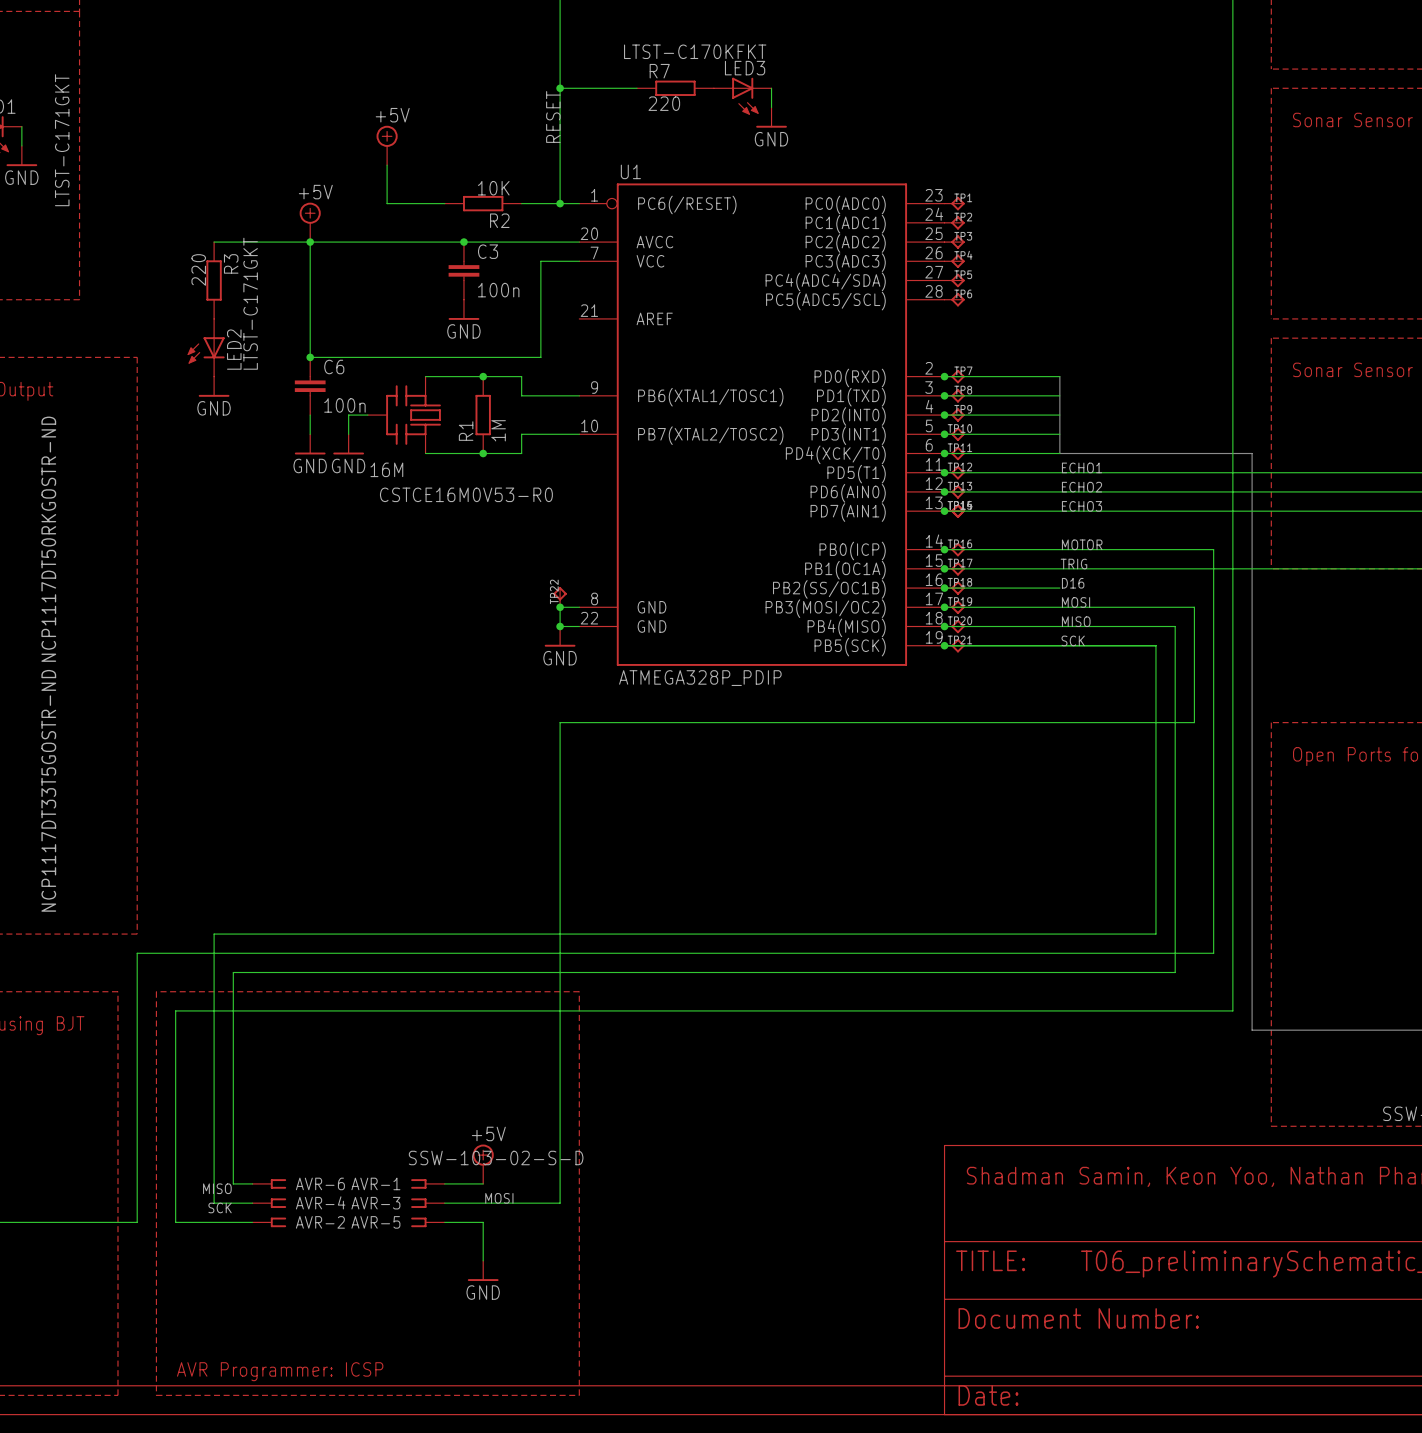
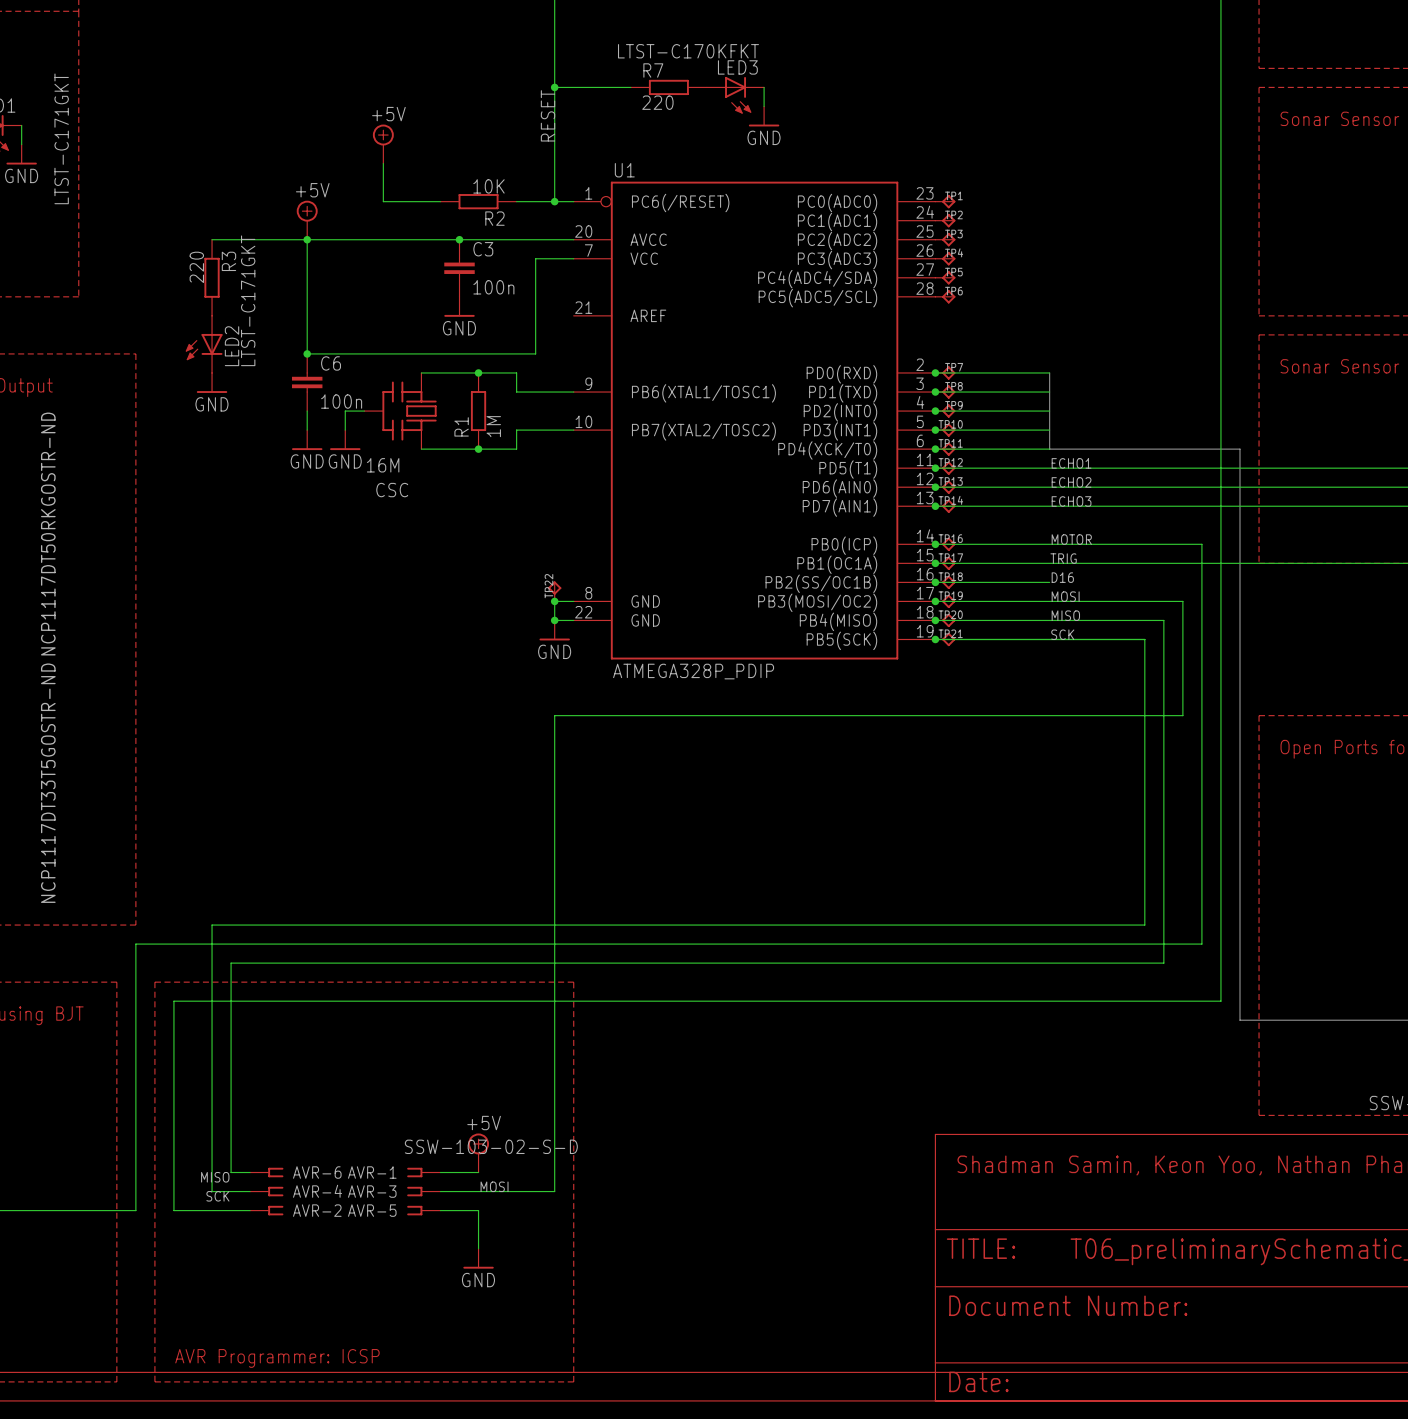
CSTCE16M0V53-R0 name: CSTCE16M0V53-R0 (466, 494) -> CSC (392, 490)
part: (954, 511) -> none

